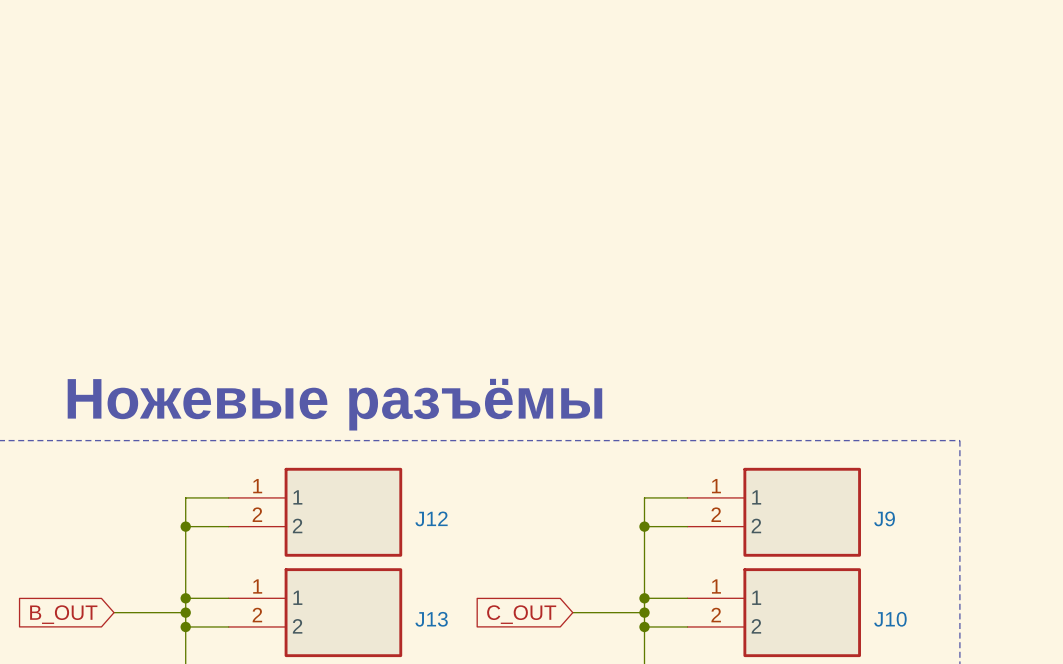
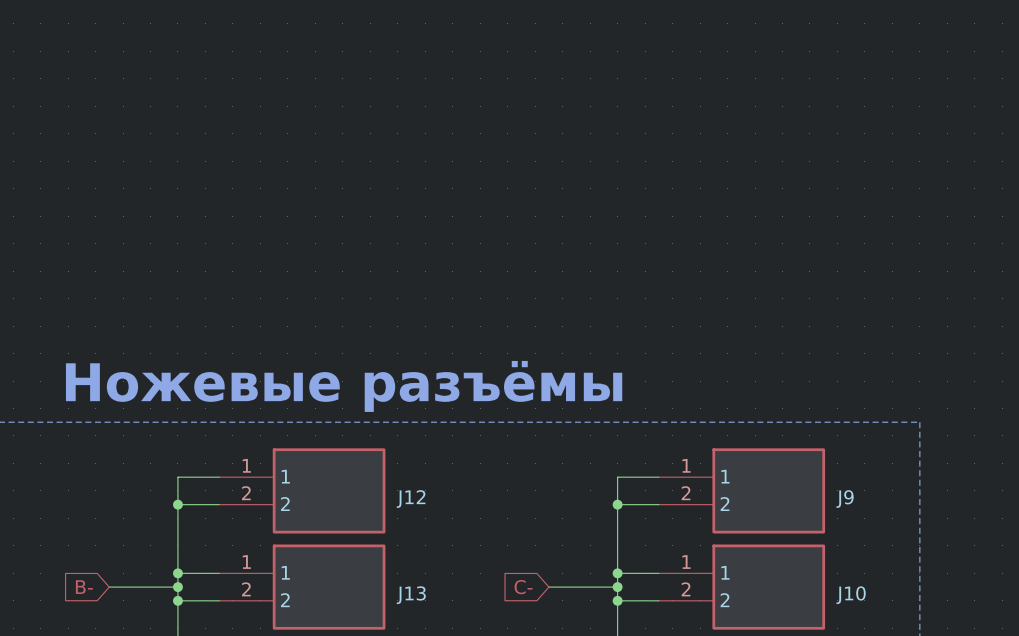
global label: B_OUT (63, 614) -> B- (84, 587)
global label: C_OUT (521, 614) -> C- (523, 587)

